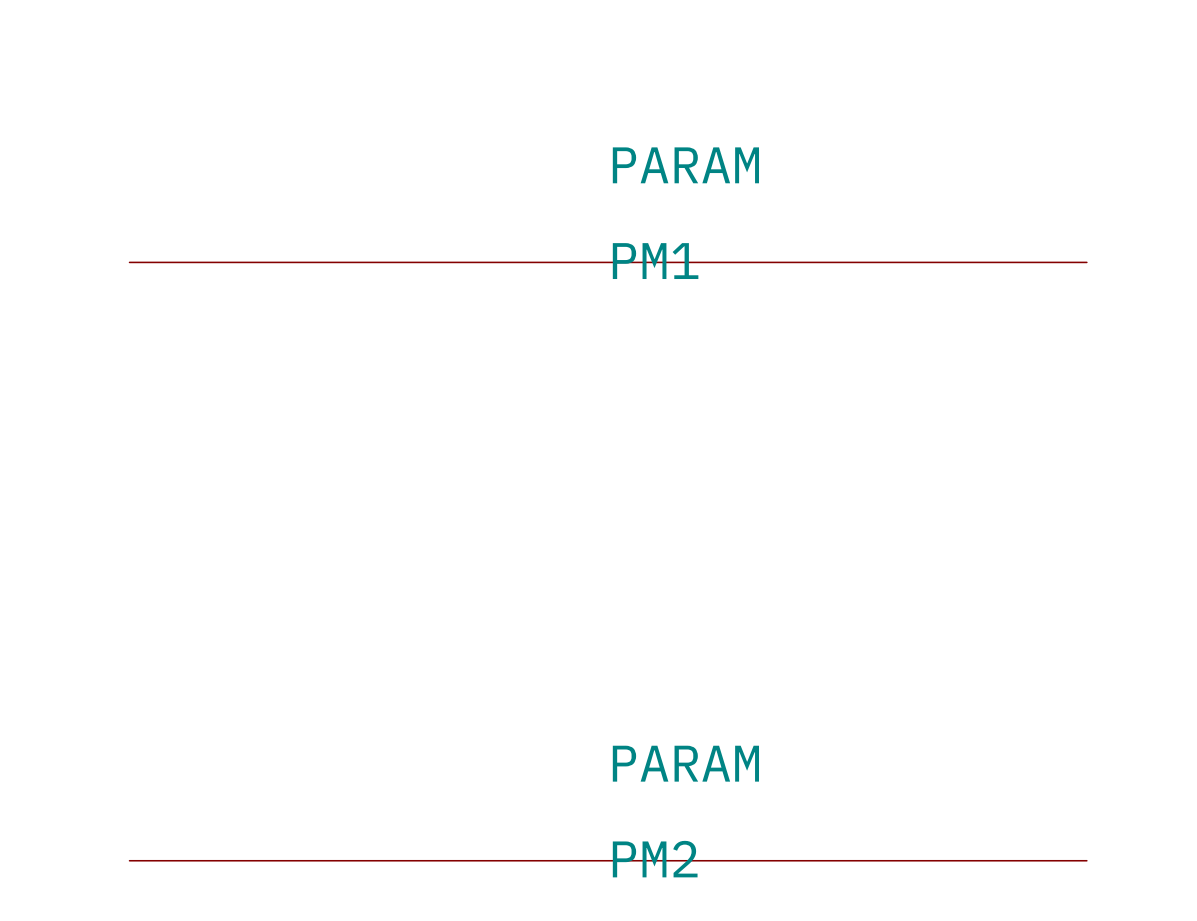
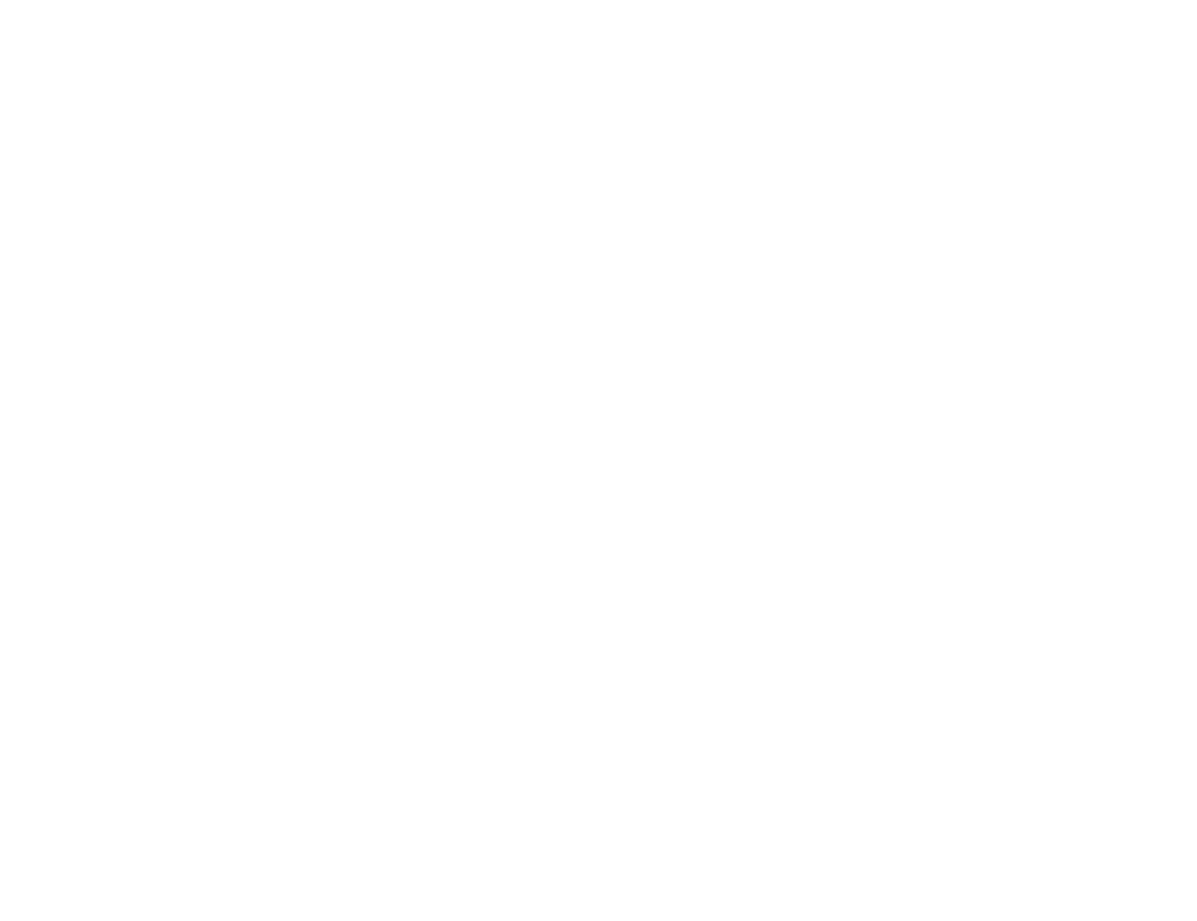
PM1: PARAM (608, 262) -> none
PM2: PARAM (608, 860) -> none

